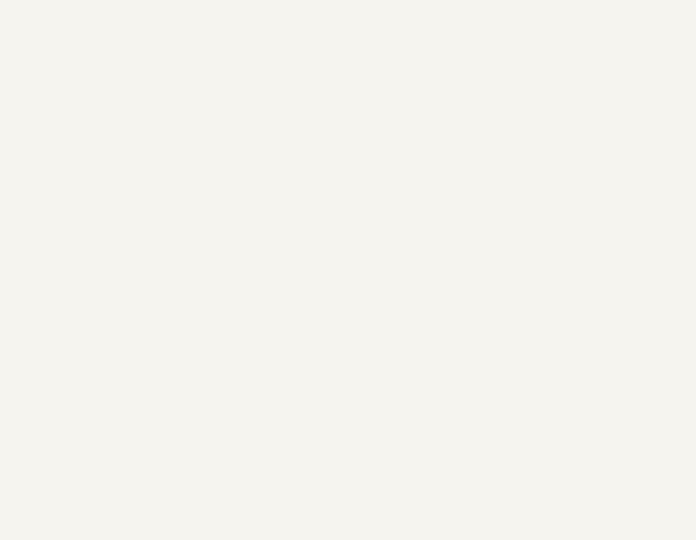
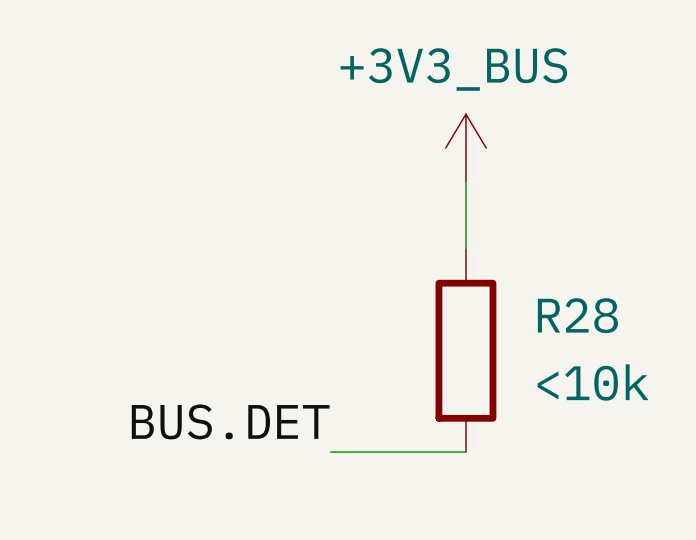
power symbol: none -> +3V3_BUS (465, 148)
wire: none -> (465, 181) (465, 249)
R28: none -> <10k (465, 350)
label: none -> BUS.DET (230, 421)
wire: none -> (330, 452) (465, 452)

